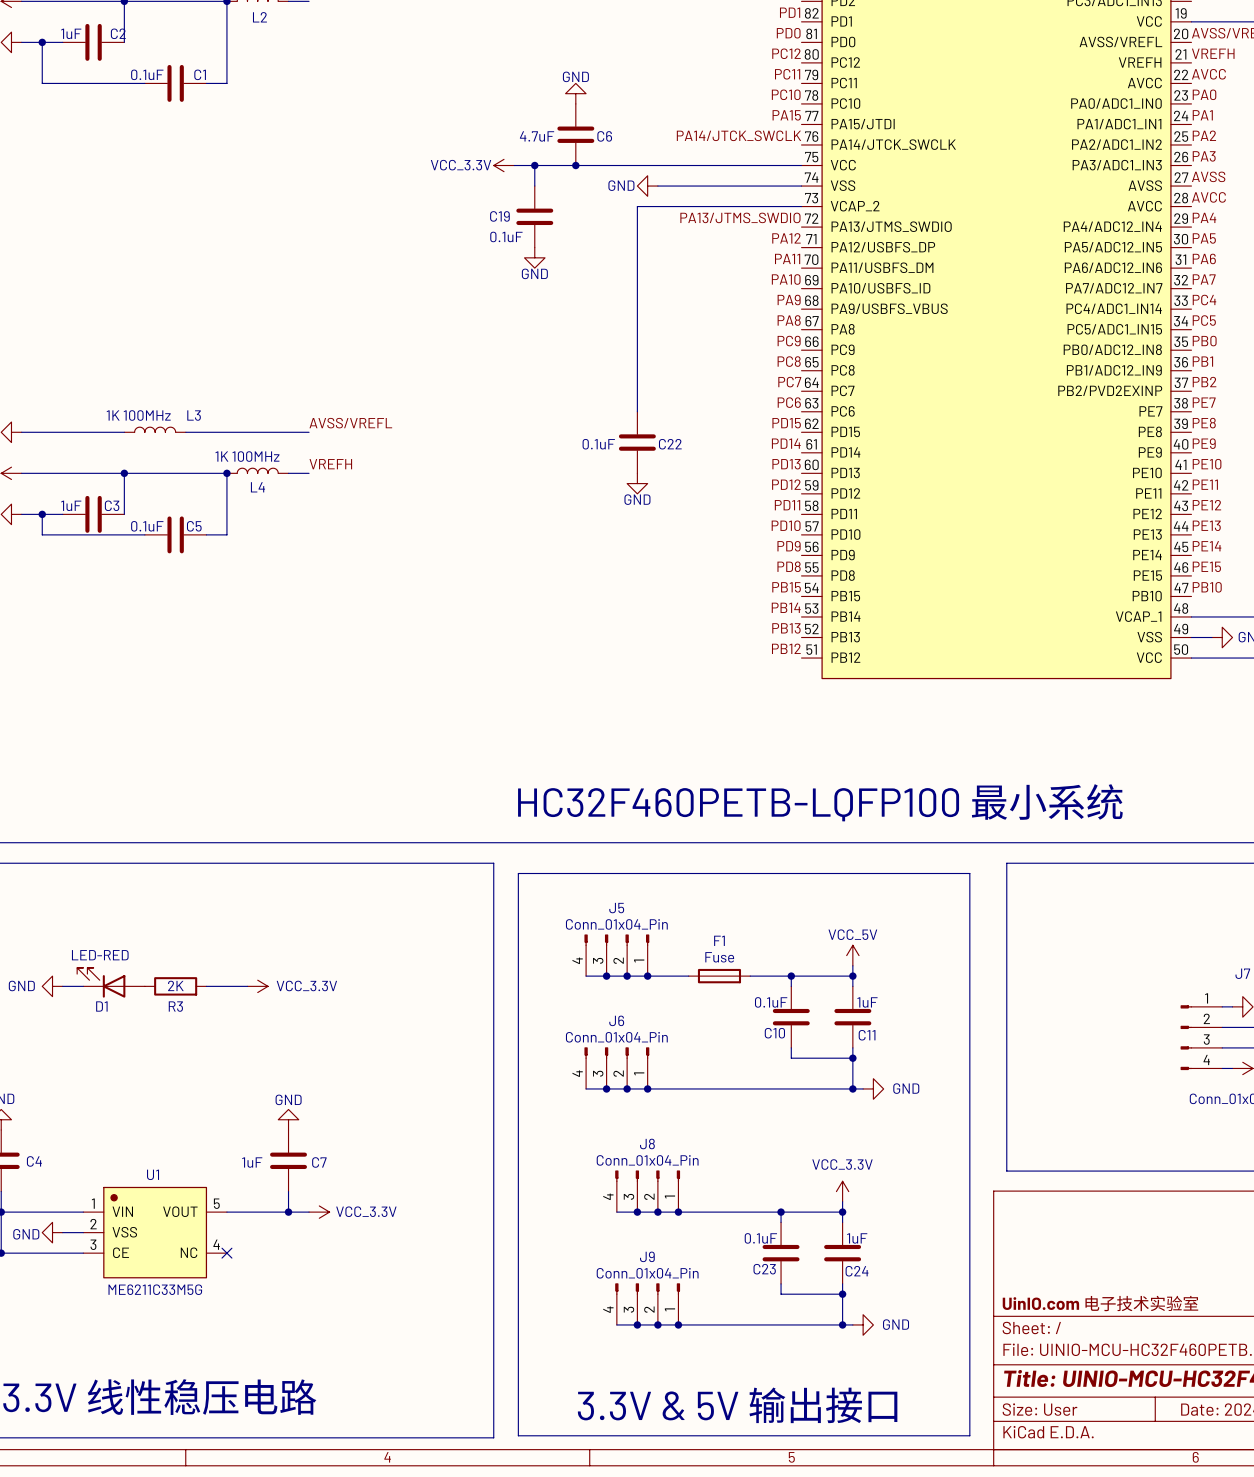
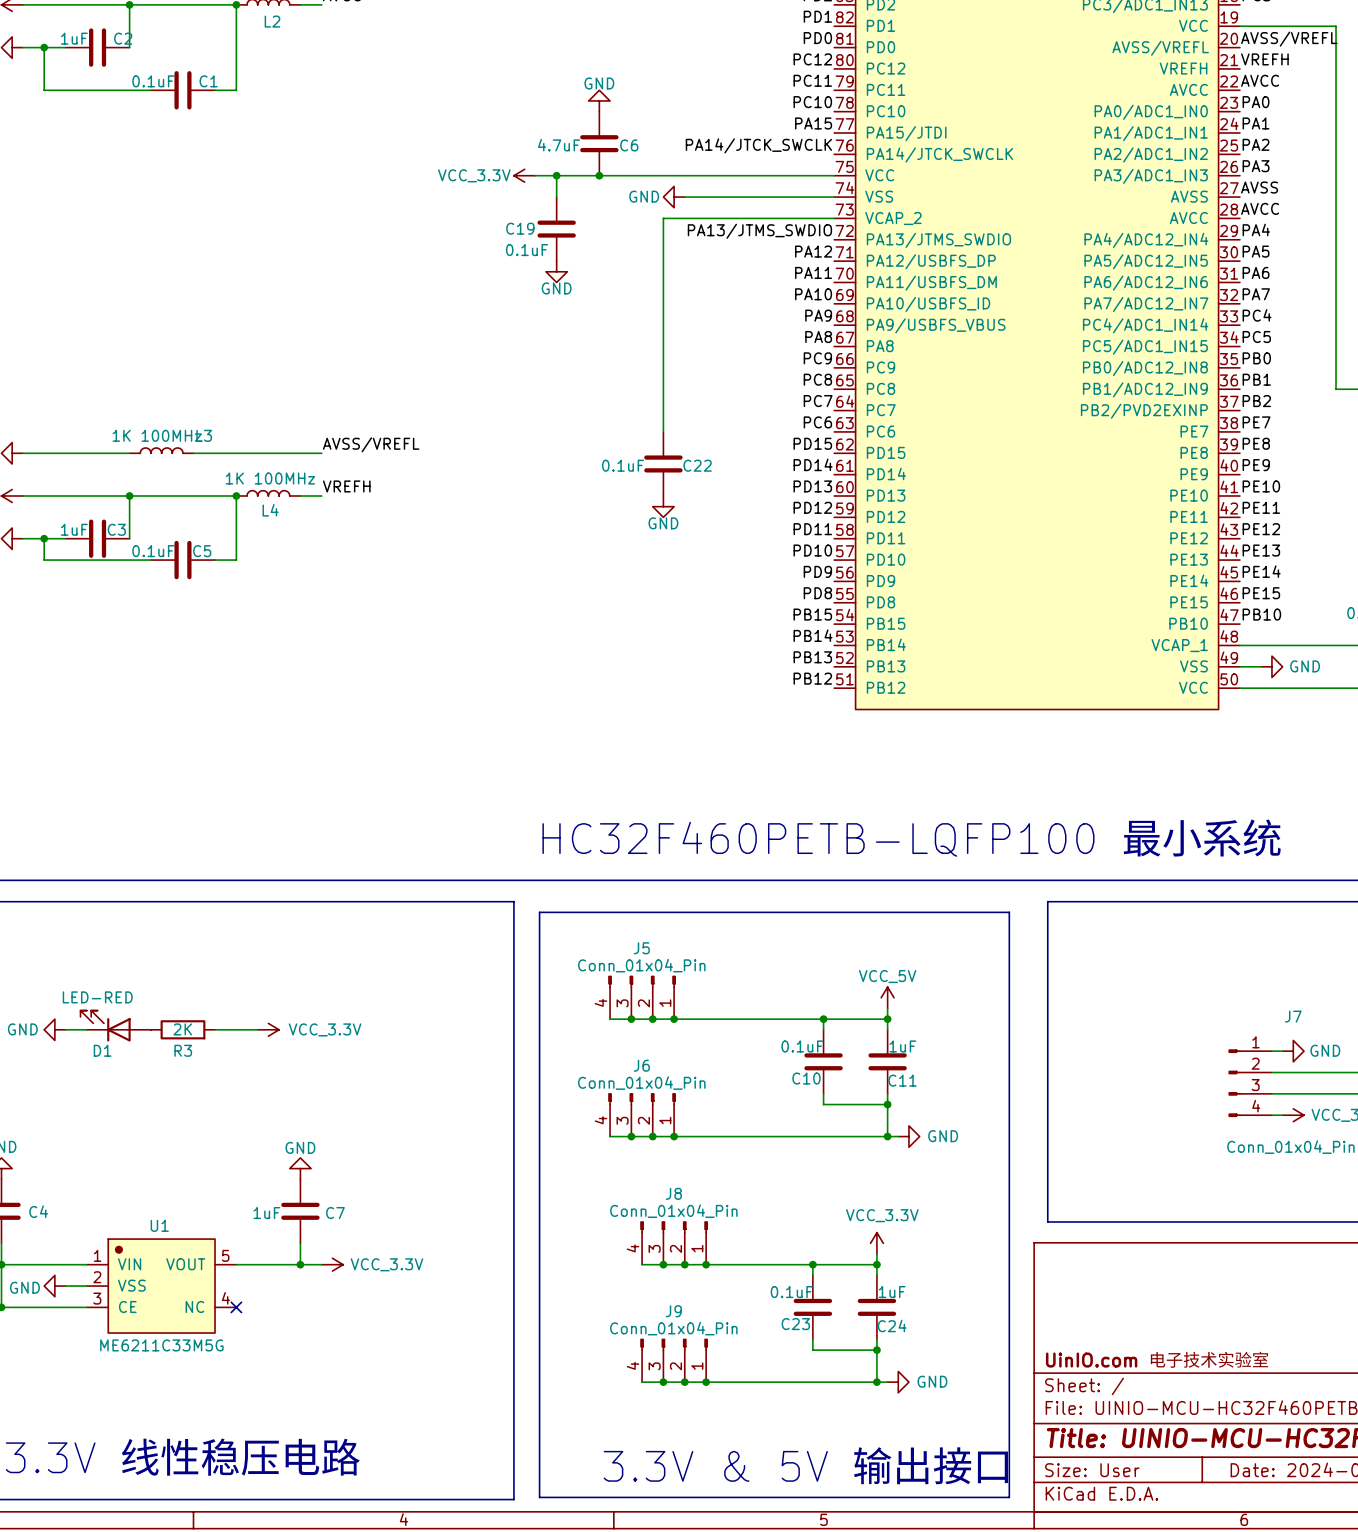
F1: Fuse (719, 976) -> none

